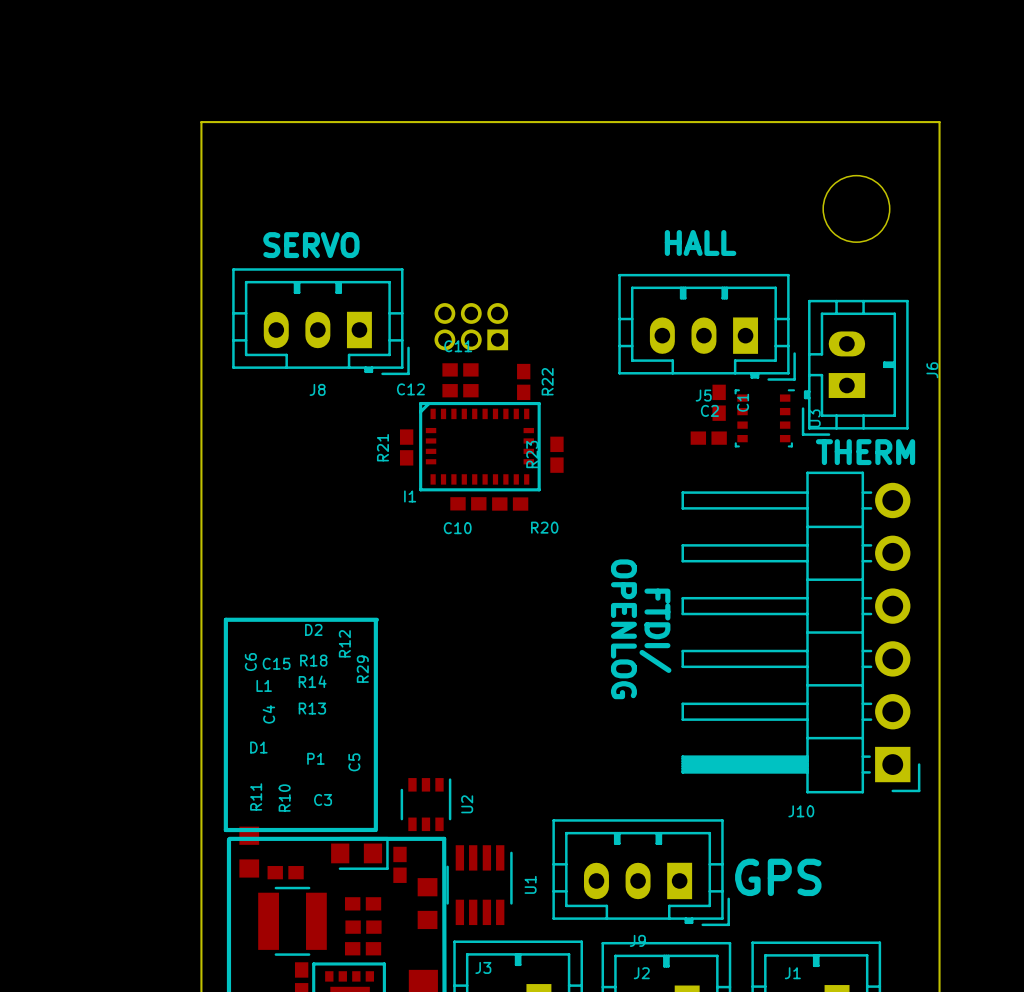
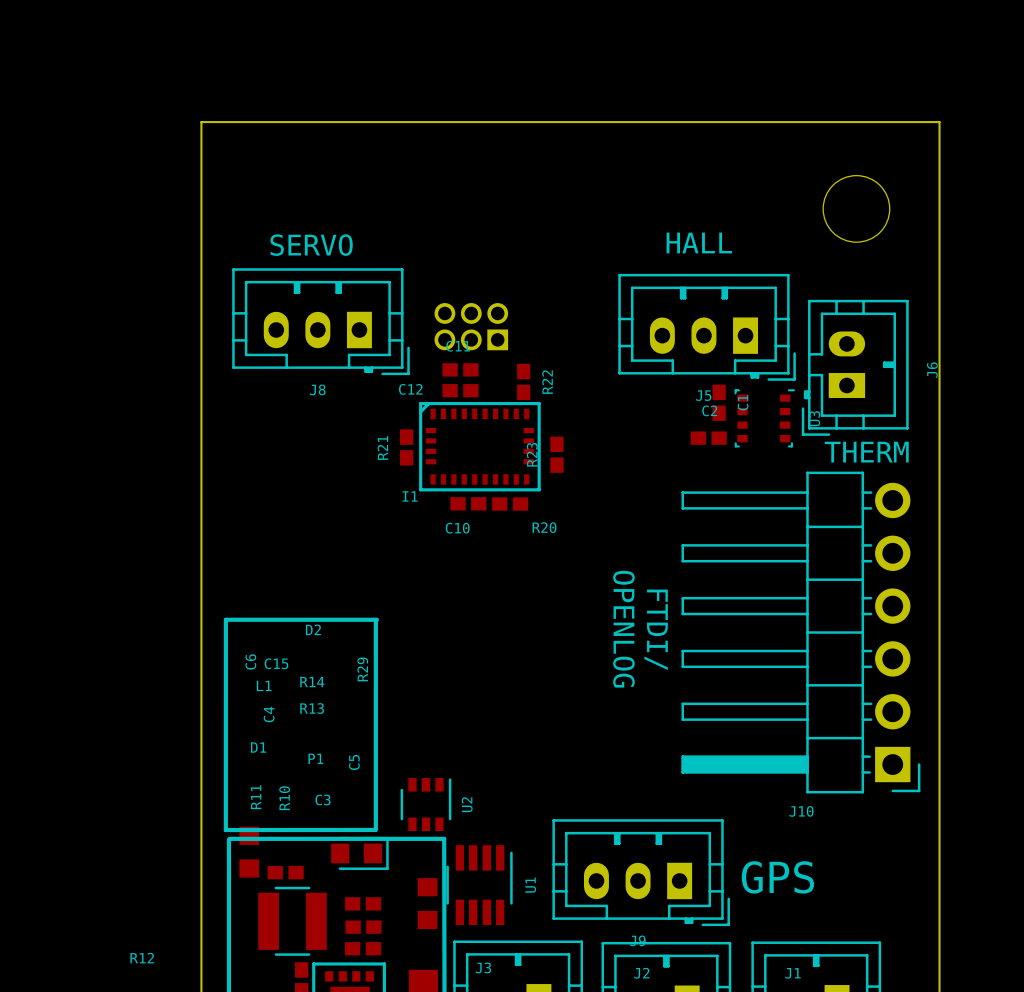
R18 name: R18 (313, 660) -> R12 (142, 958)
R12: (399, 864) -> none

